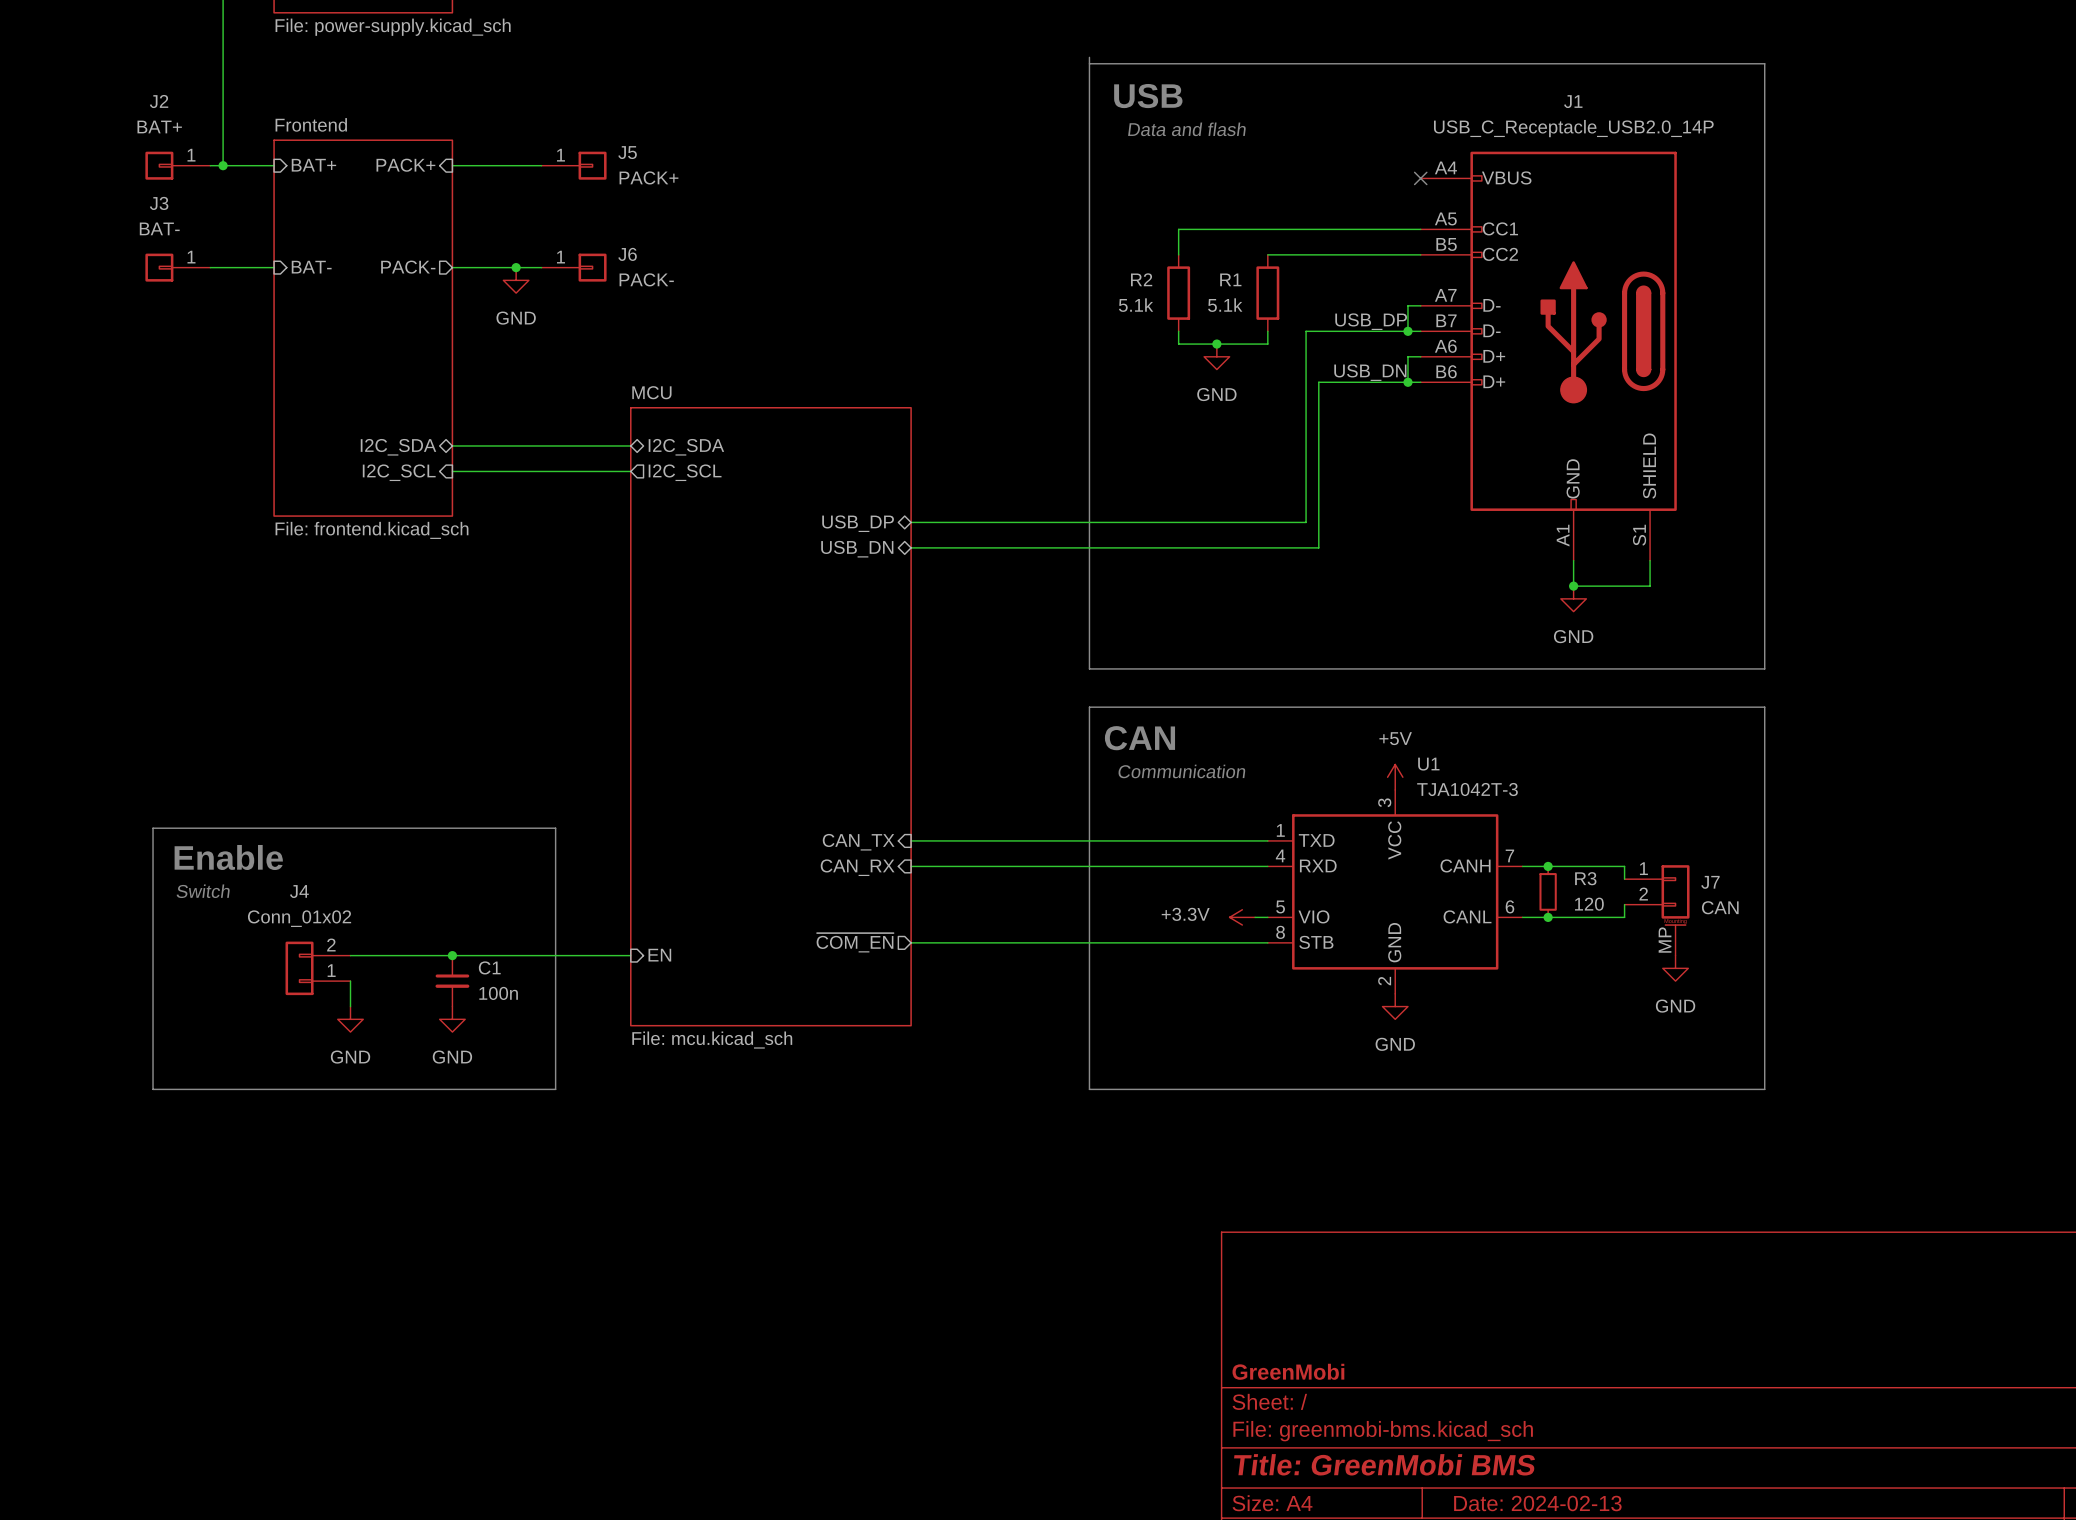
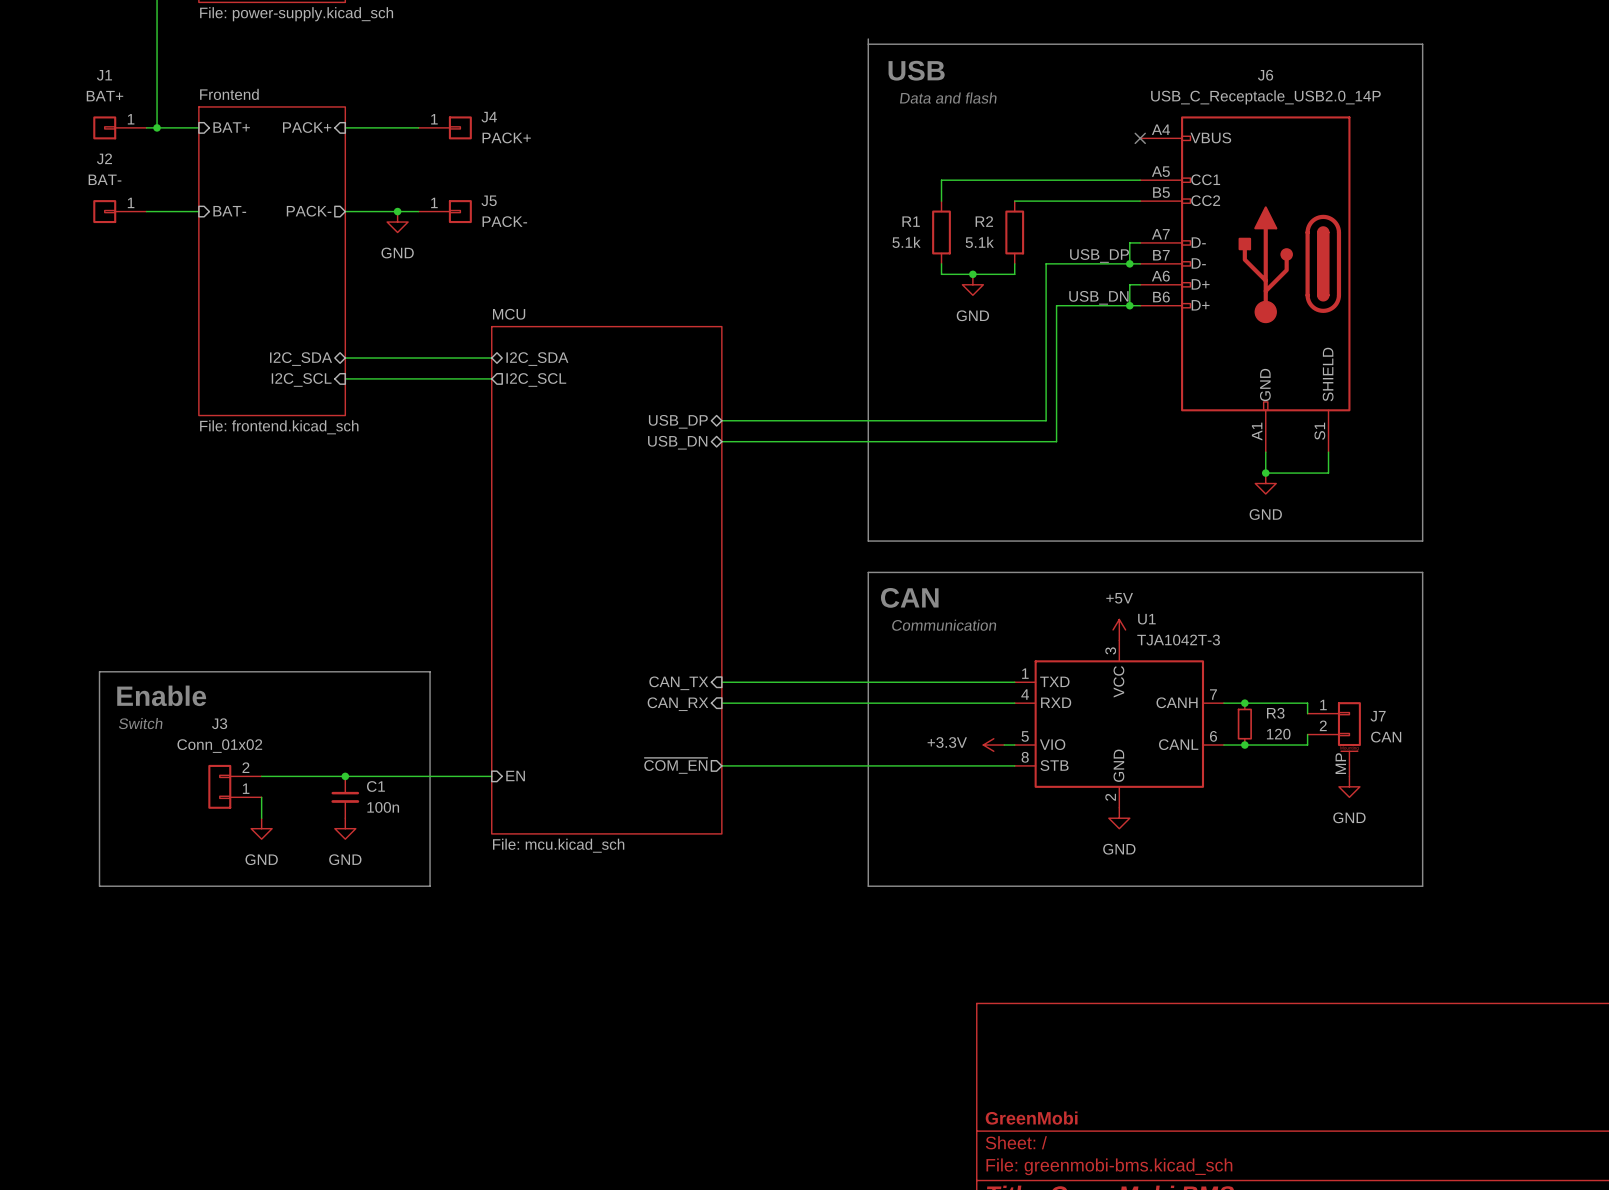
J2 name: J2 (159, 101) -> J1 (104, 75)
J1 name: J1 (1573, 101) -> J6 (1265, 75)
J5 name: J5 (627, 152) -> J4 (489, 117)
J3 name: J3 (159, 203) -> J2 (104, 158)
J6 name: J6 (627, 254) -> J5 (489, 200)
R2 name: R2 (1141, 279) -> R1 (911, 221)
R1 name: R1 (1230, 279) -> R2 (984, 221)
J4 name: J4 (299, 891) -> J3 (219, 723)

